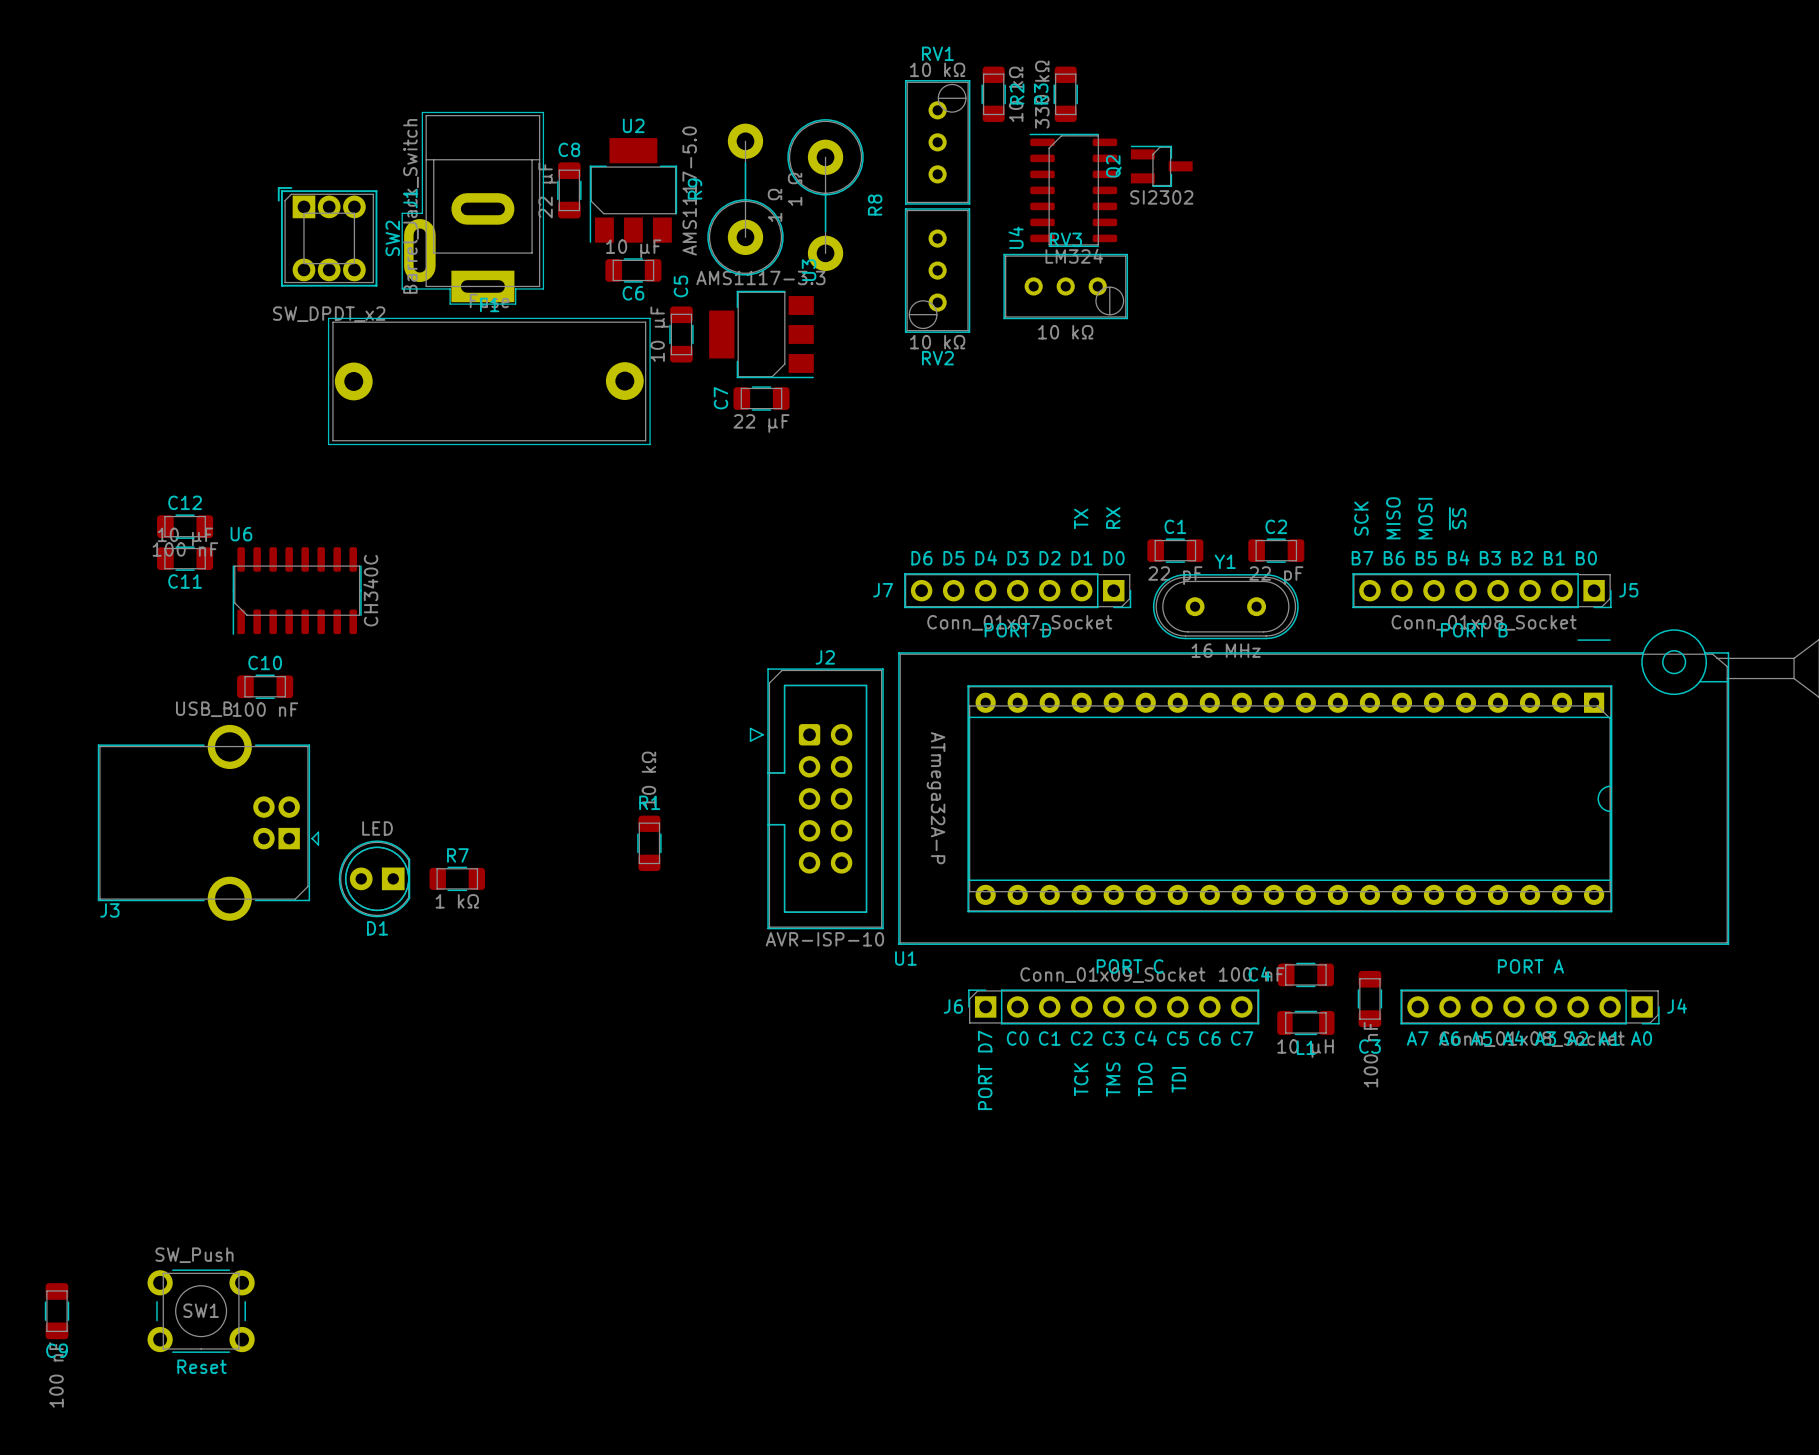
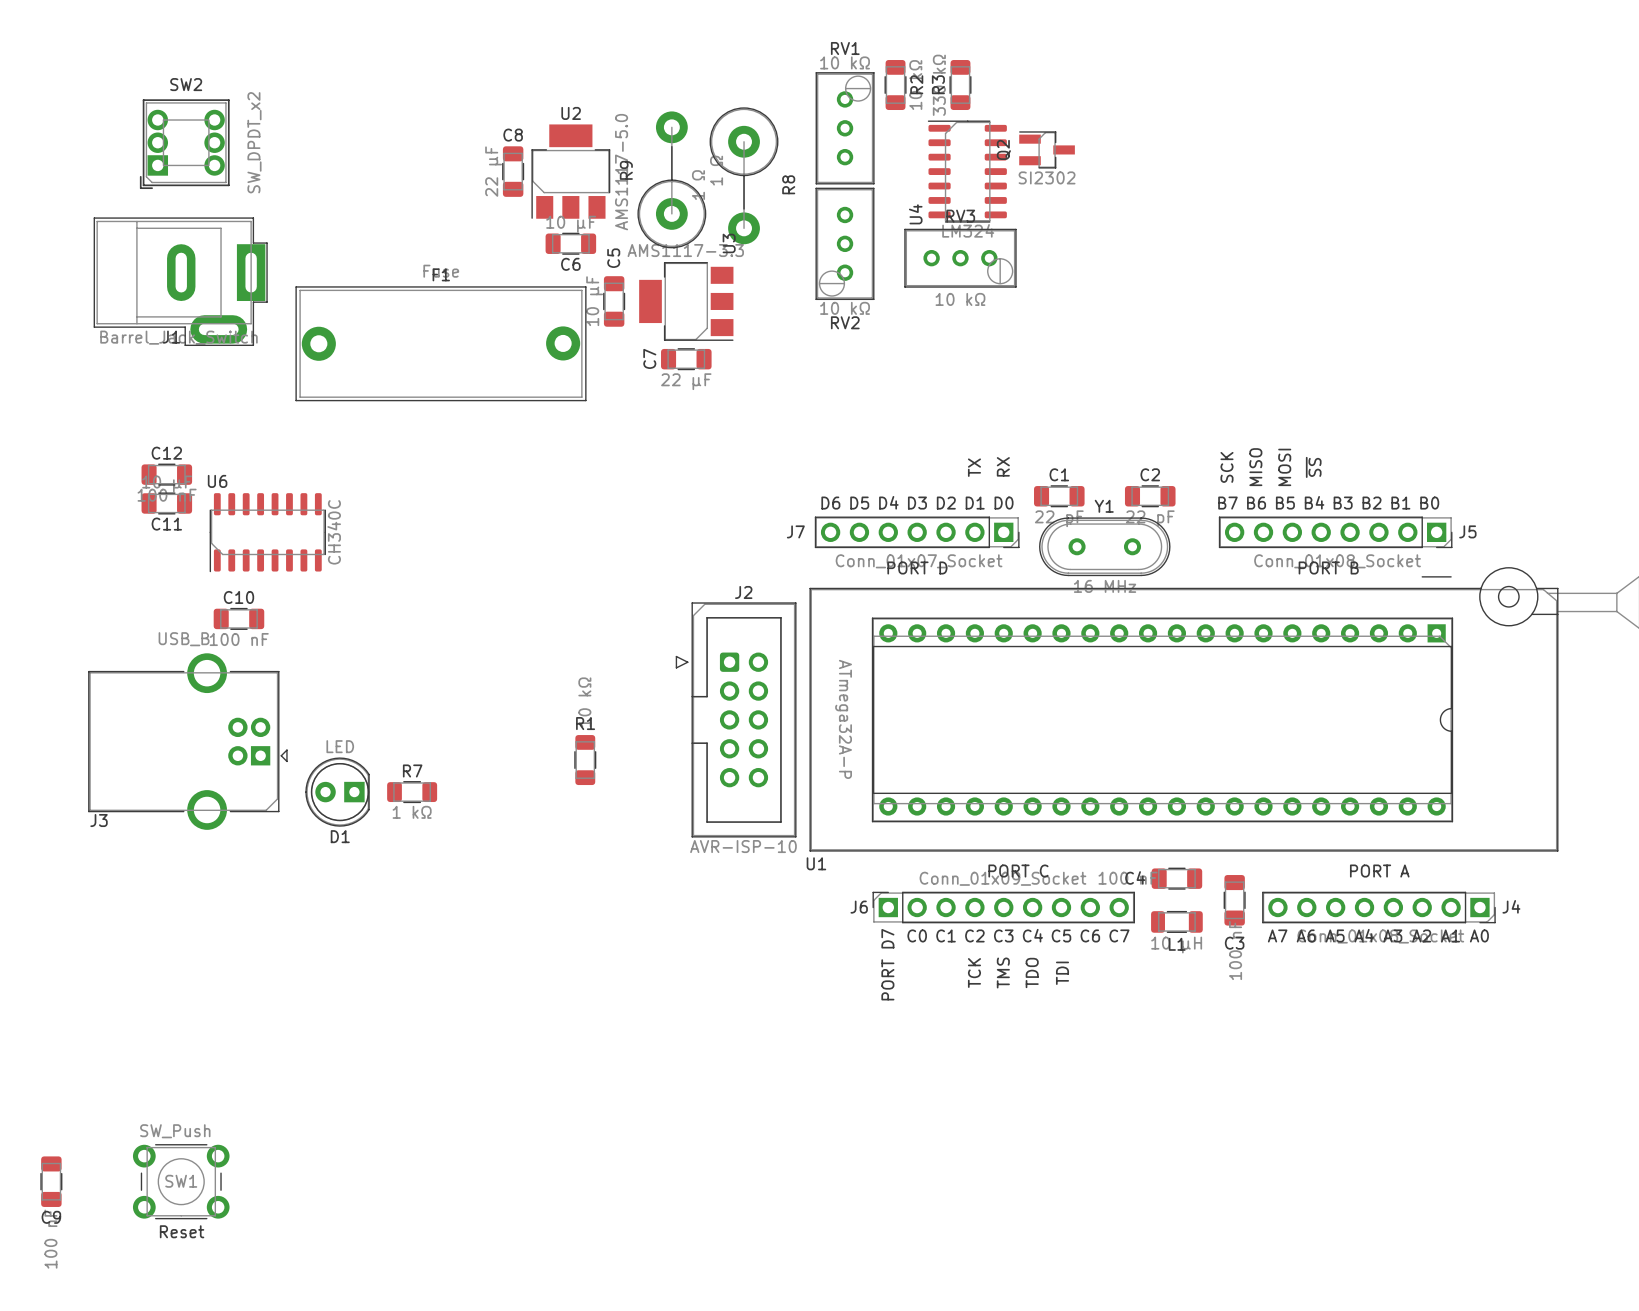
J1 rotation: 0° (472, 208) -> 90° counterclockwise (180, 281)
J1 position: (472, 208) -> (180, 281)
SW2 rotation: 0° (327, 236) -> 90° counterclockwise (184, 144)
SW2 position: (327, 236) -> (184, 144)

